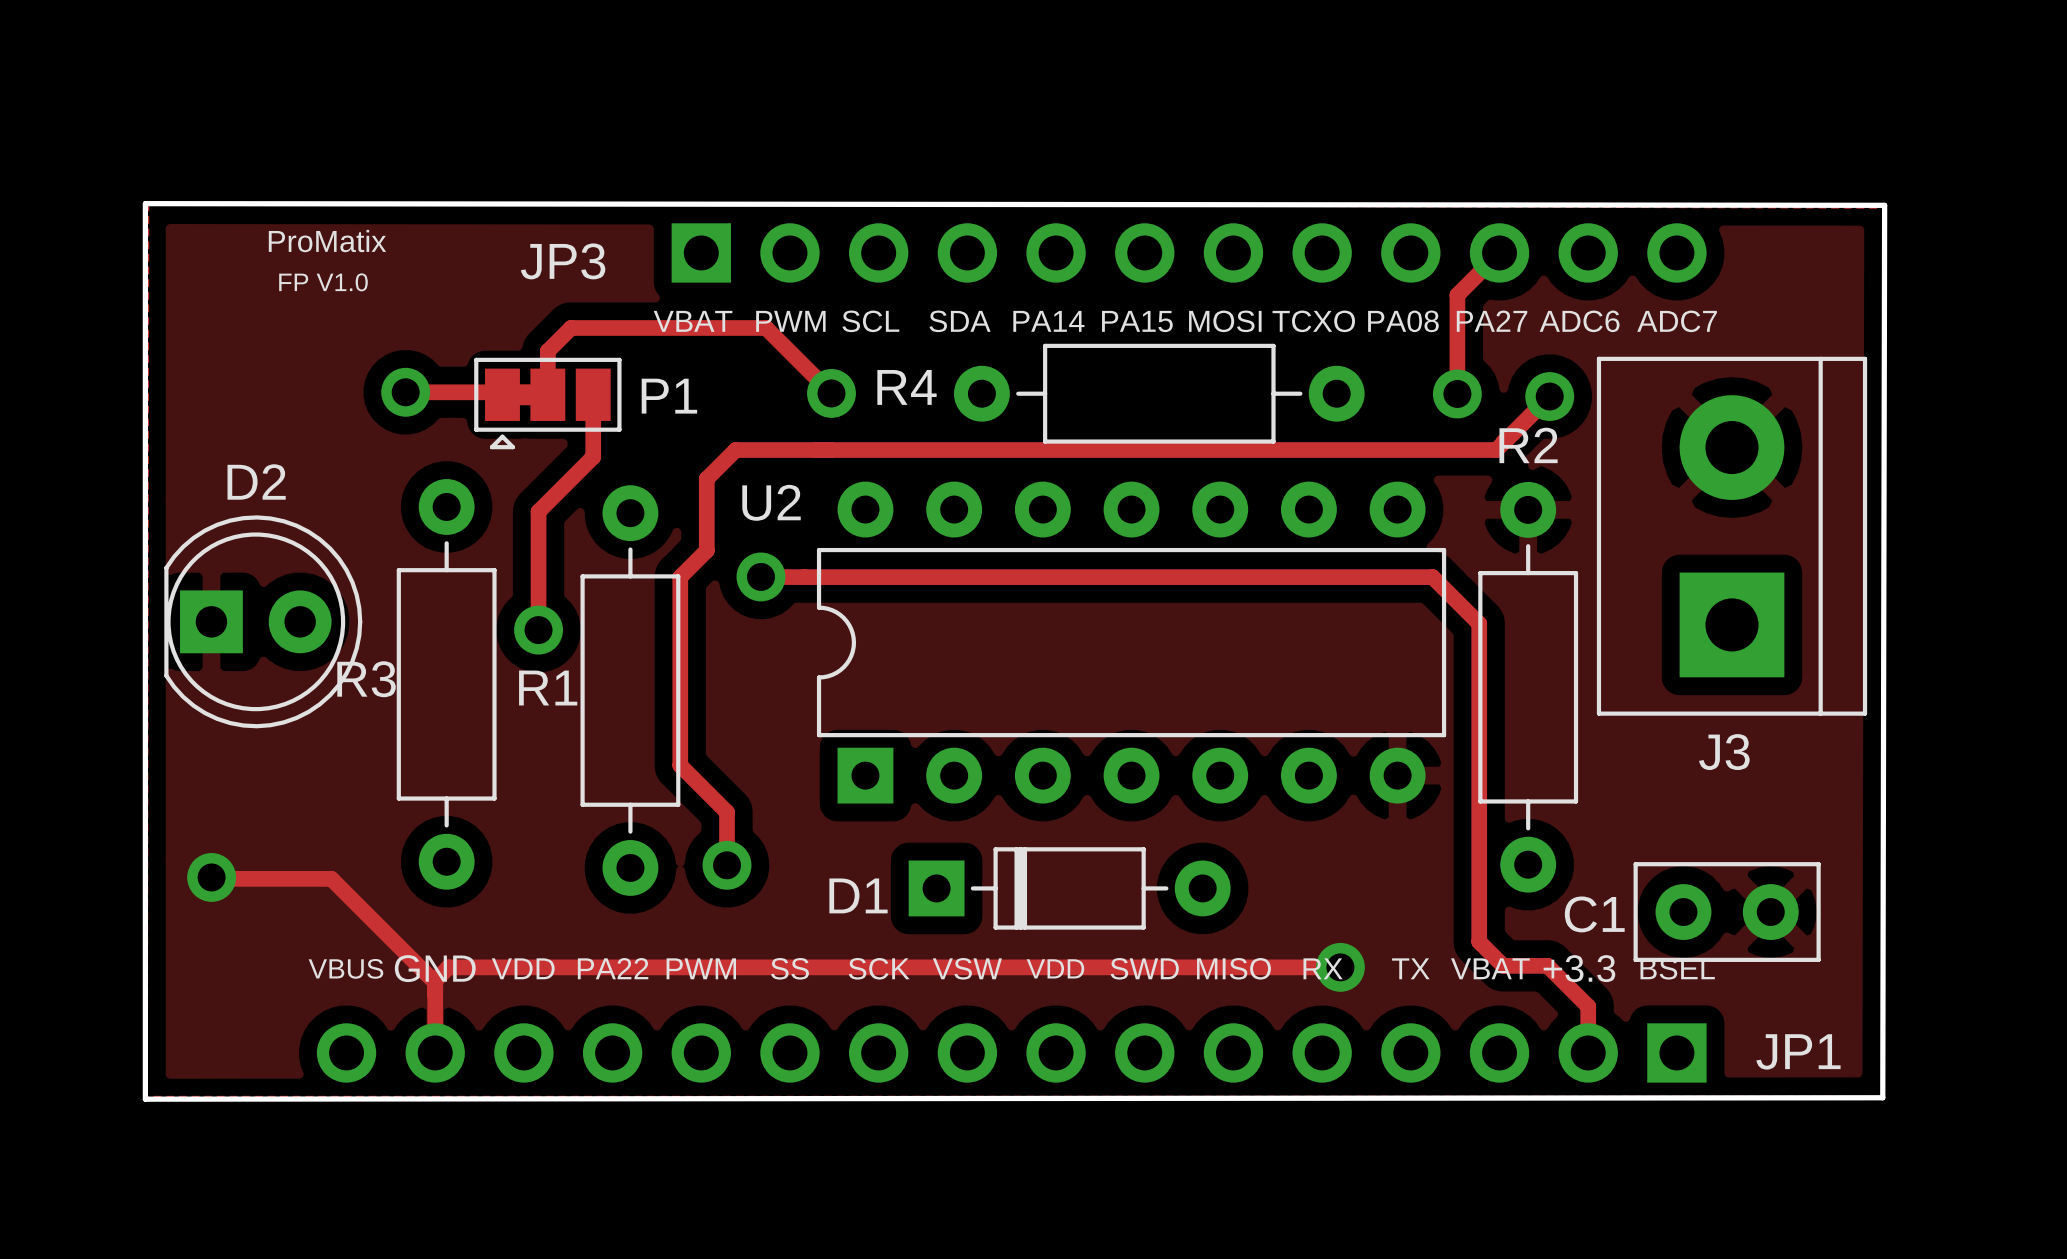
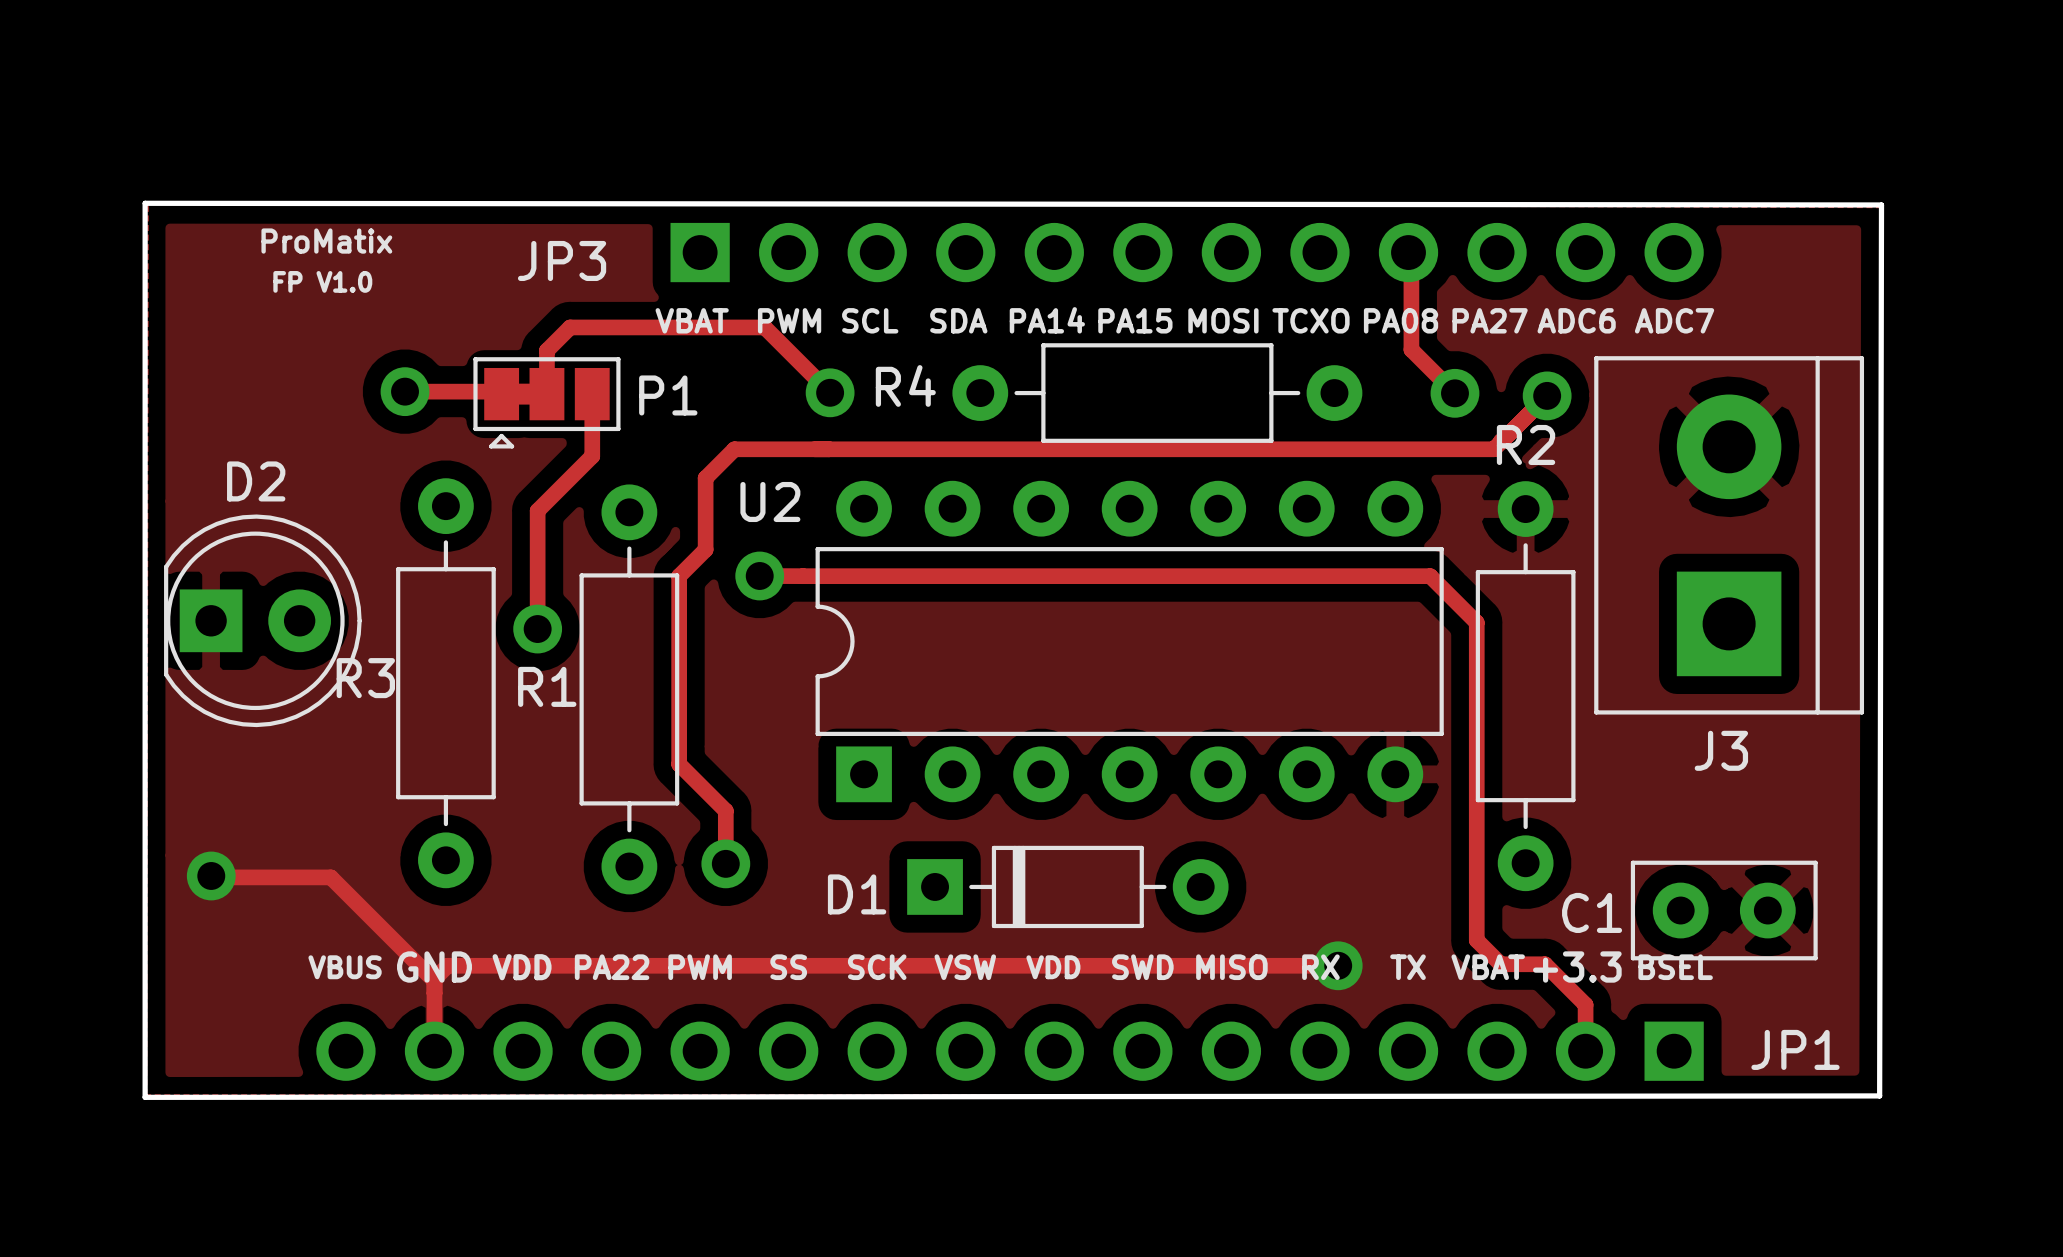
track: (1499, 252) (1457, 295) (1457, 393) -> (1408, 252) (1411, 255) (1411, 349) (1454, 393)

